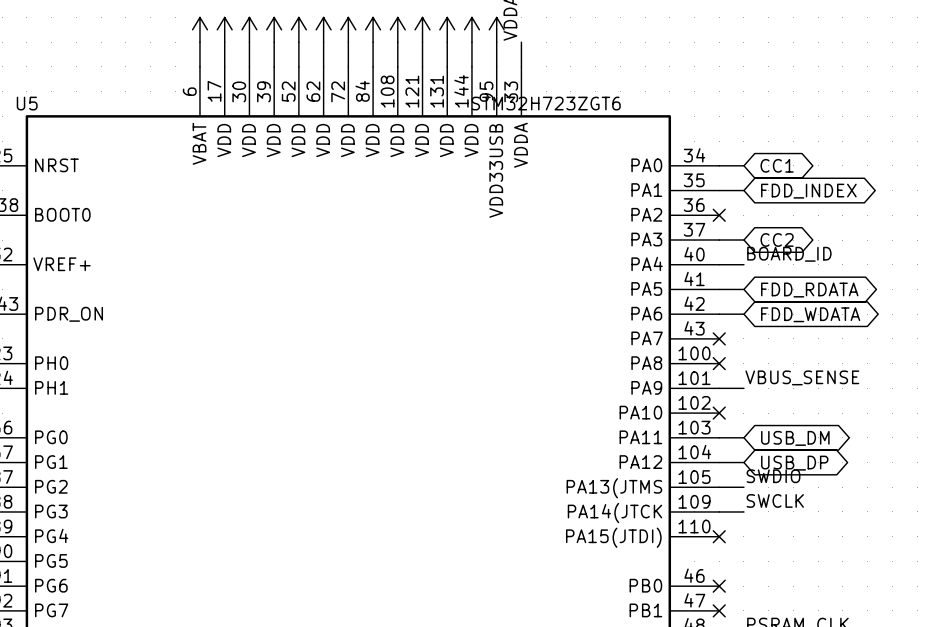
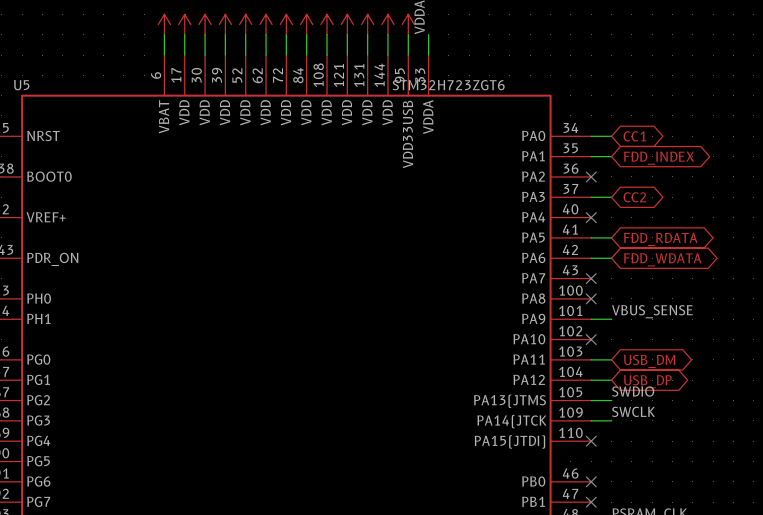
label: BOARD_ID (789, 254) -> none
wire: (719, 264) (743, 264) -> none
no-connect mark: none -> (591, 217)

